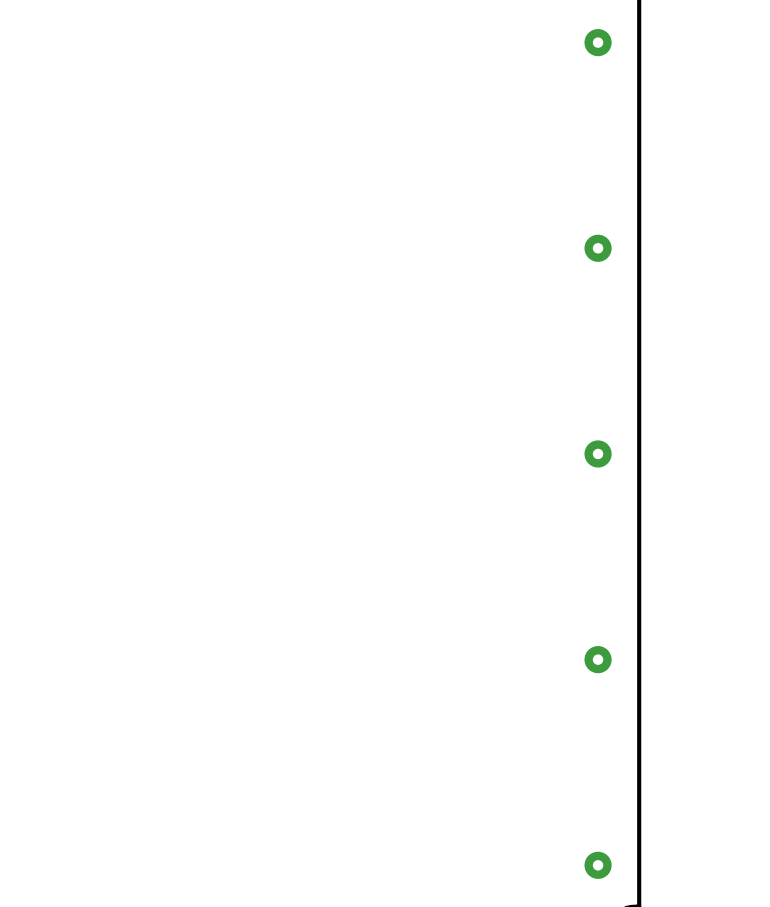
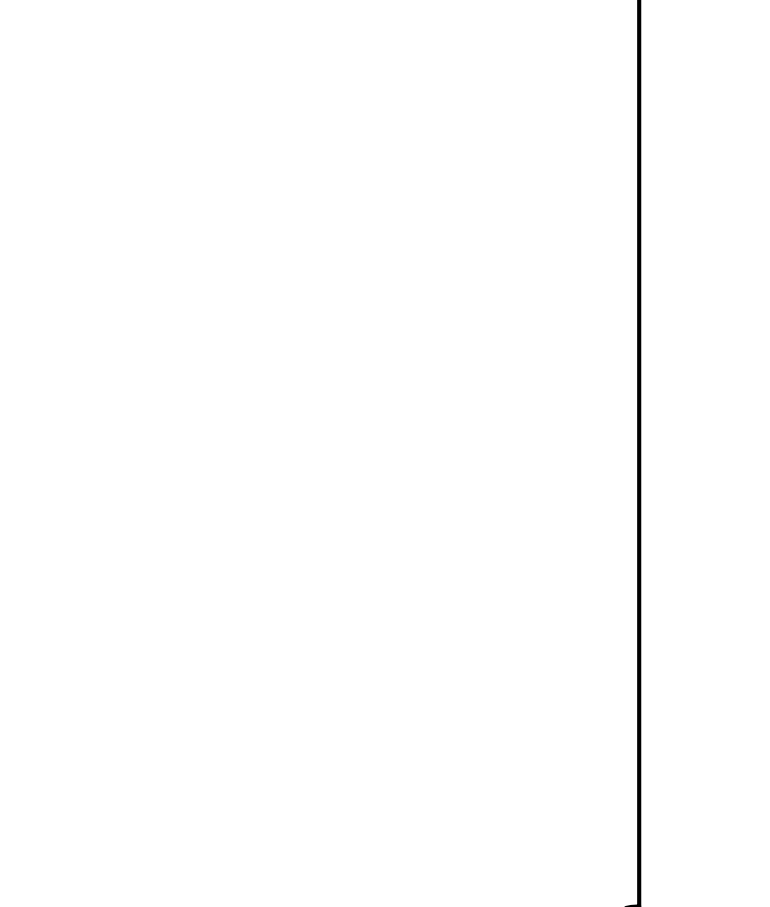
via: (598, 42) -> none
via: (598, 248) -> none
via: (598, 453) -> none
via: (598, 659) -> none
via: (598, 865) -> none

